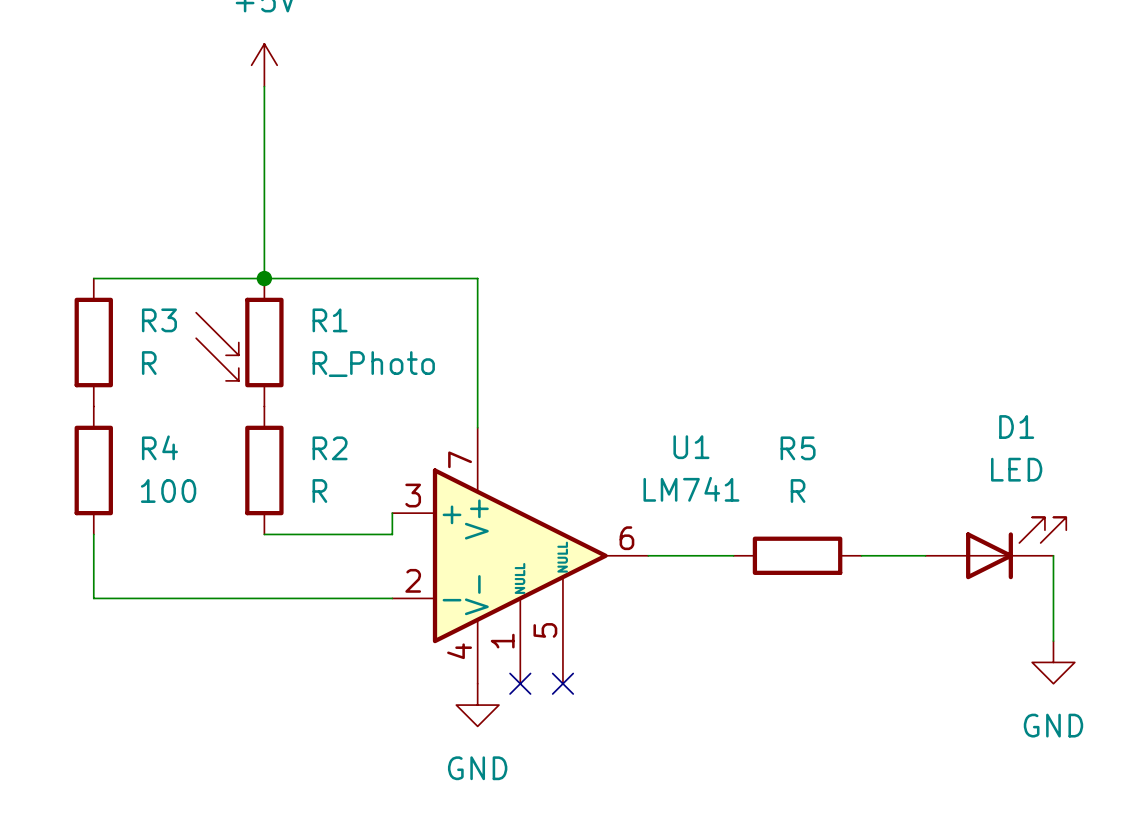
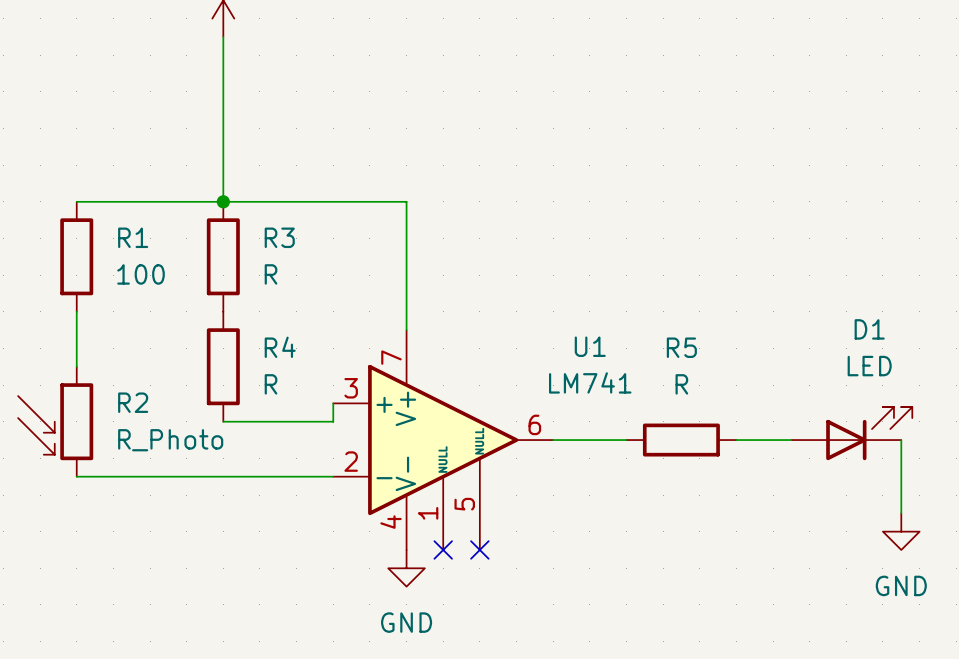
R3 name: R3 (159, 320) -> R1 (133, 237)
R1: R_Photo (239, 342) -> none
R3: none -> R (223, 256)
R3 value: R (149, 363) -> 100 (141, 274)
R2 name: R2 (330, 448) -> R4 (280, 347)
R4: 100 (93, 470) -> none
R2: none -> R_Photo (55, 421)
wire: (93, 534) (93, 598) -> (76, 311) (76, 366)

